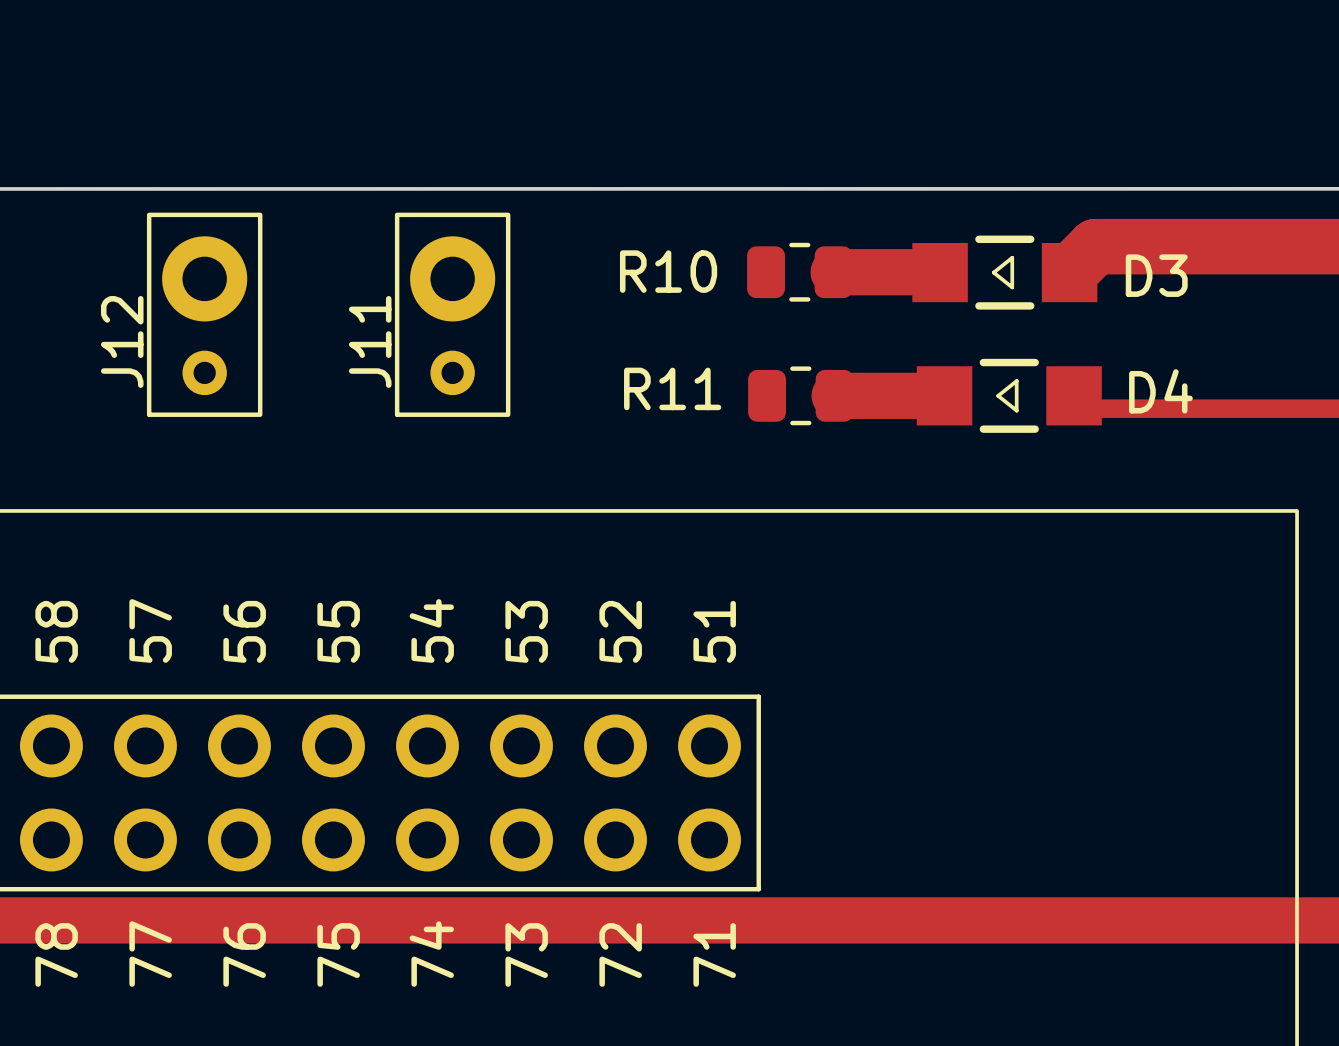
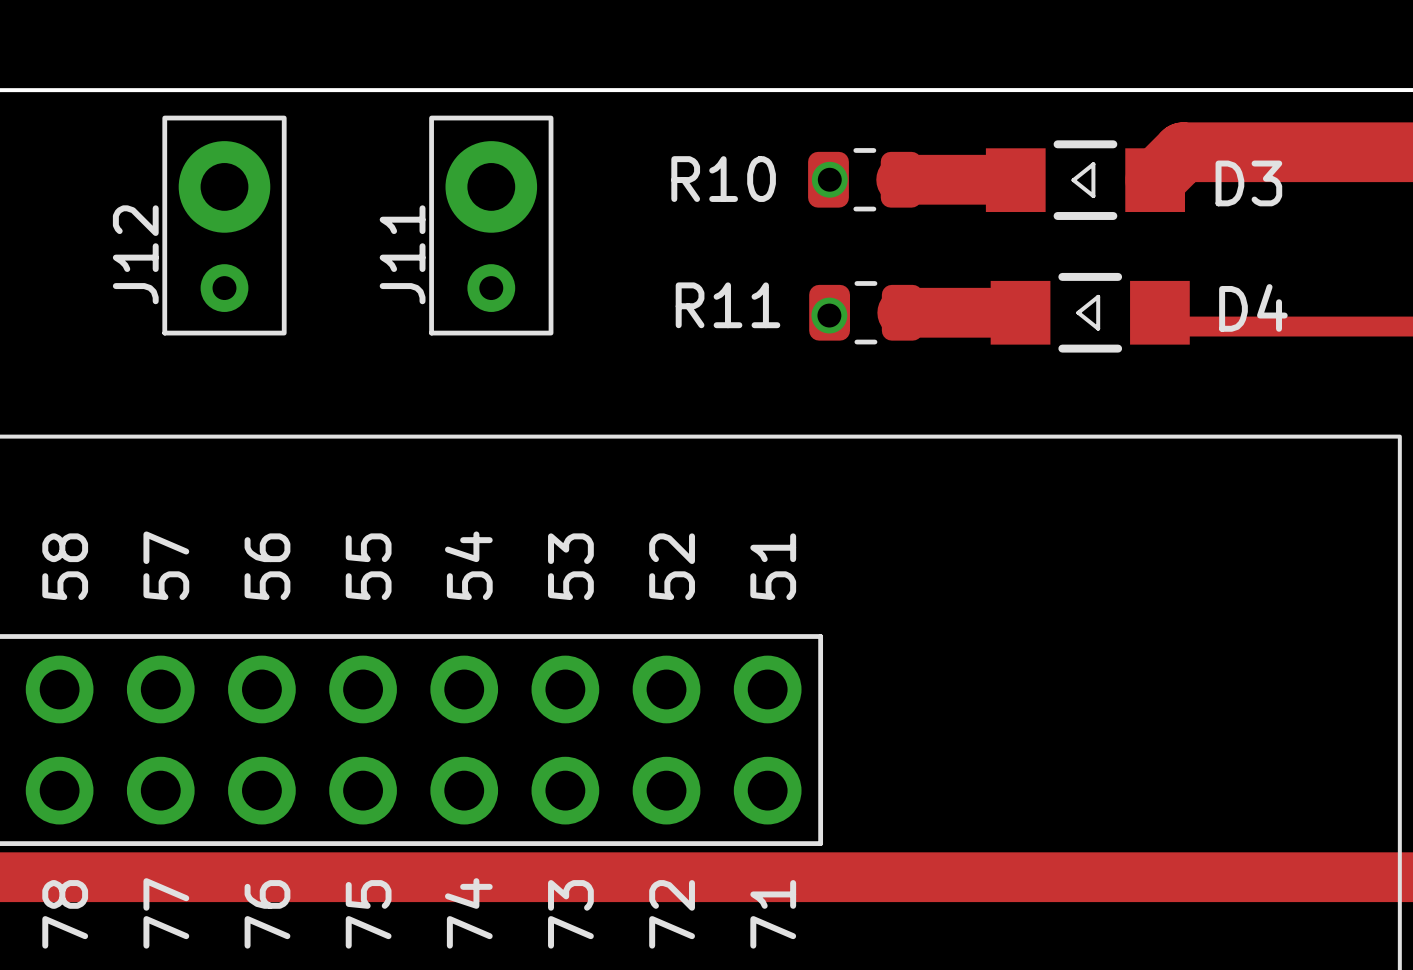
via: none -> (829, 179)
via: none -> (829, 315)

